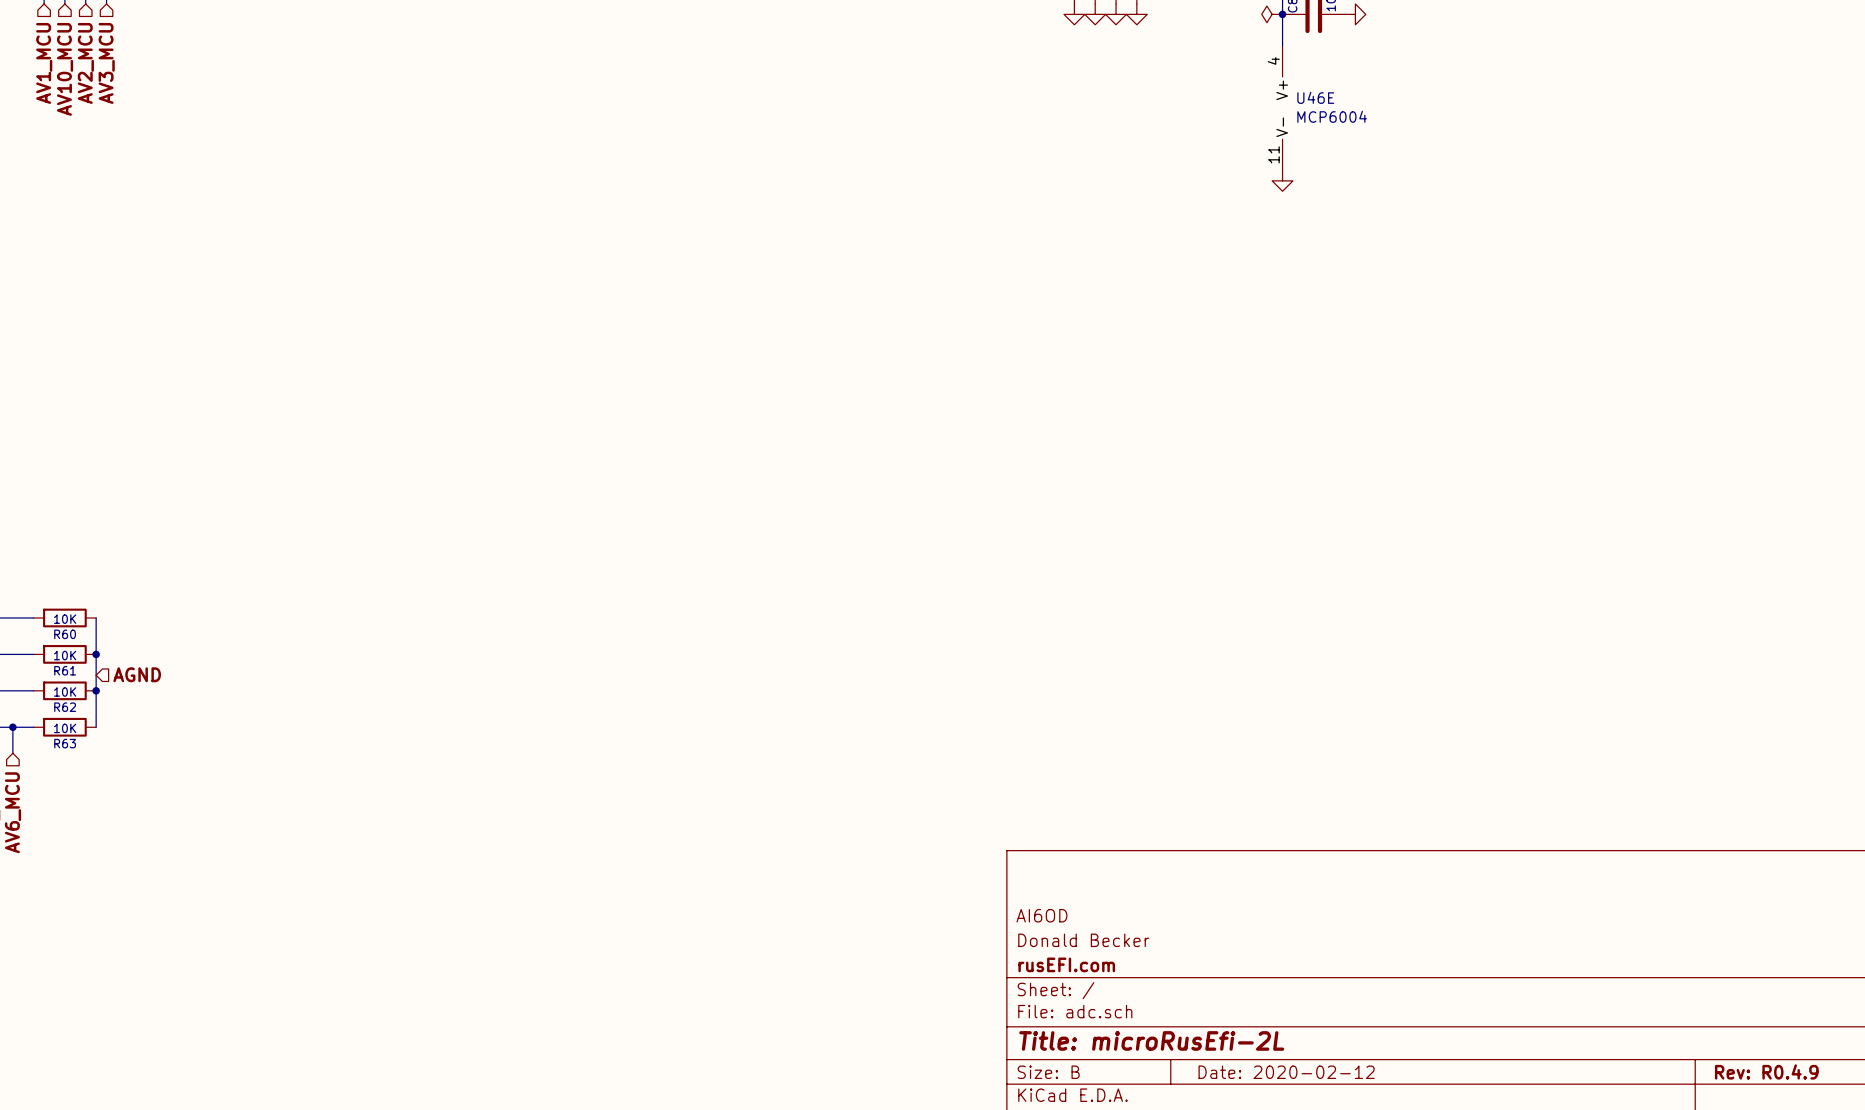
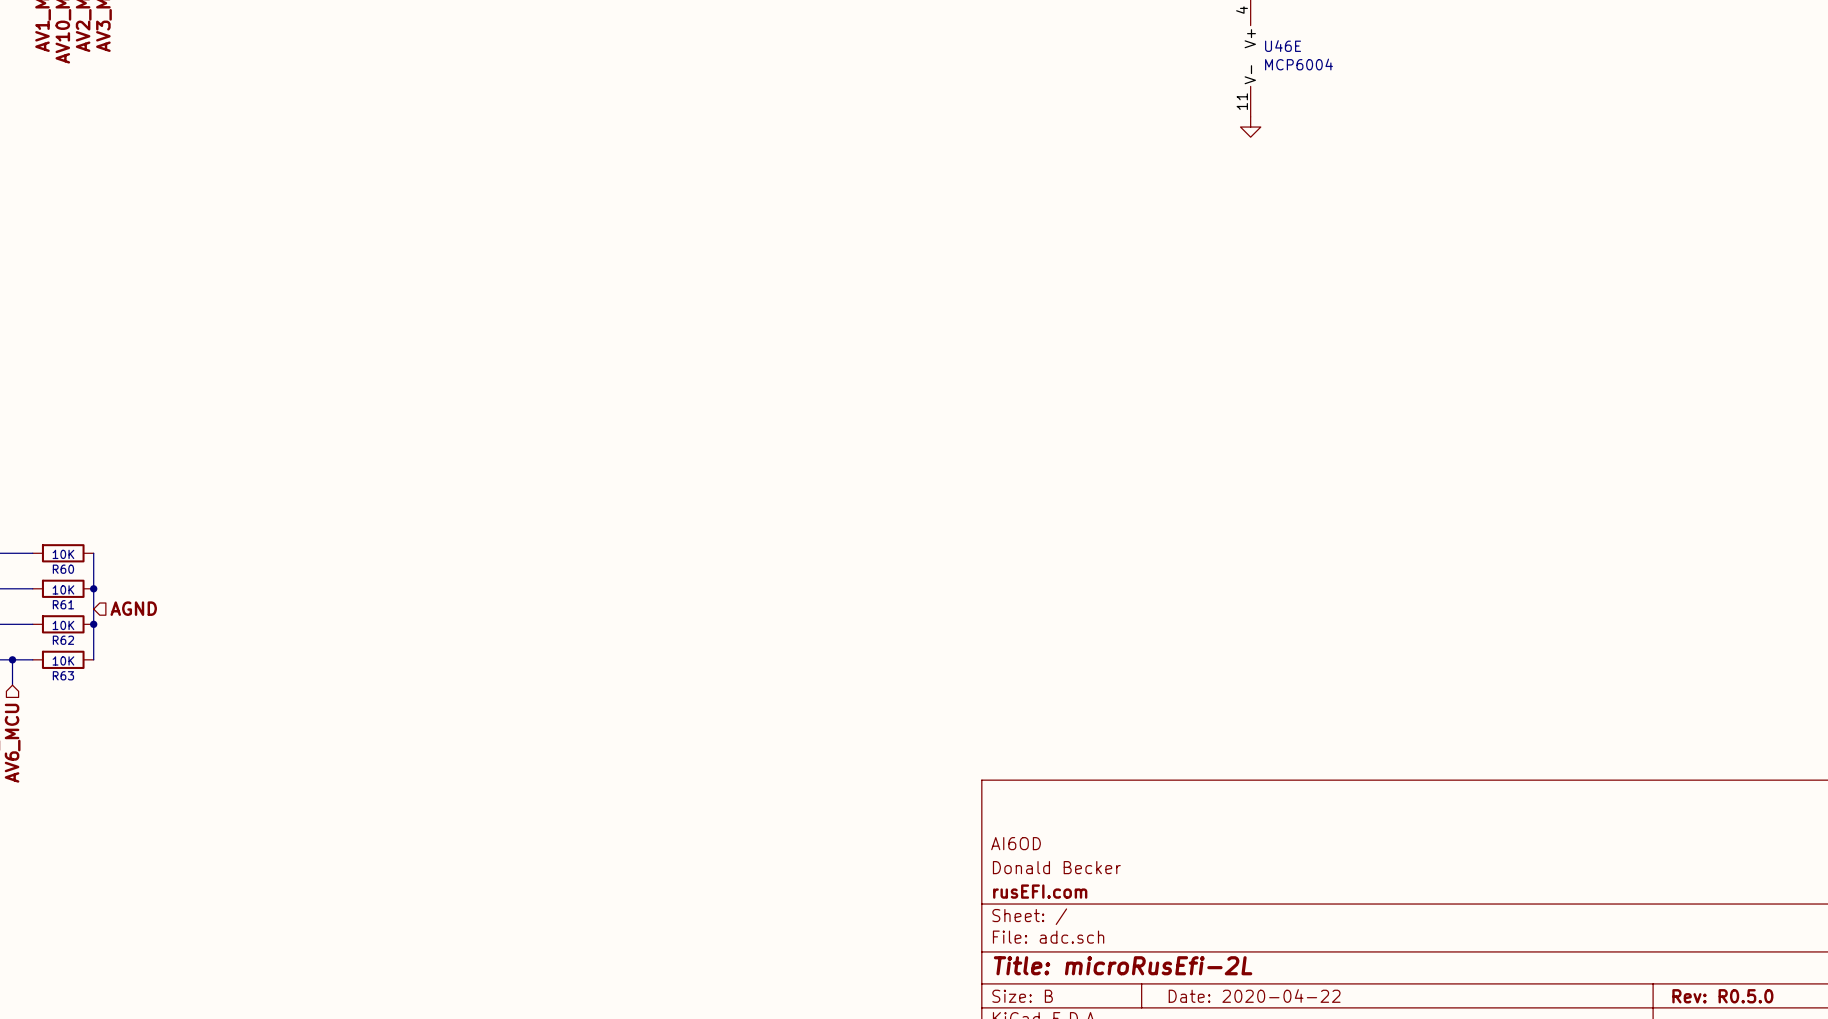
title block: Rev: R0.4.9 (1766, 1071) -> Rev: R0.5.0 (1722, 996)
title block: Date: 2020-02-12 (1286, 1072) -> Date: 2020-04-22 (1254, 995)

